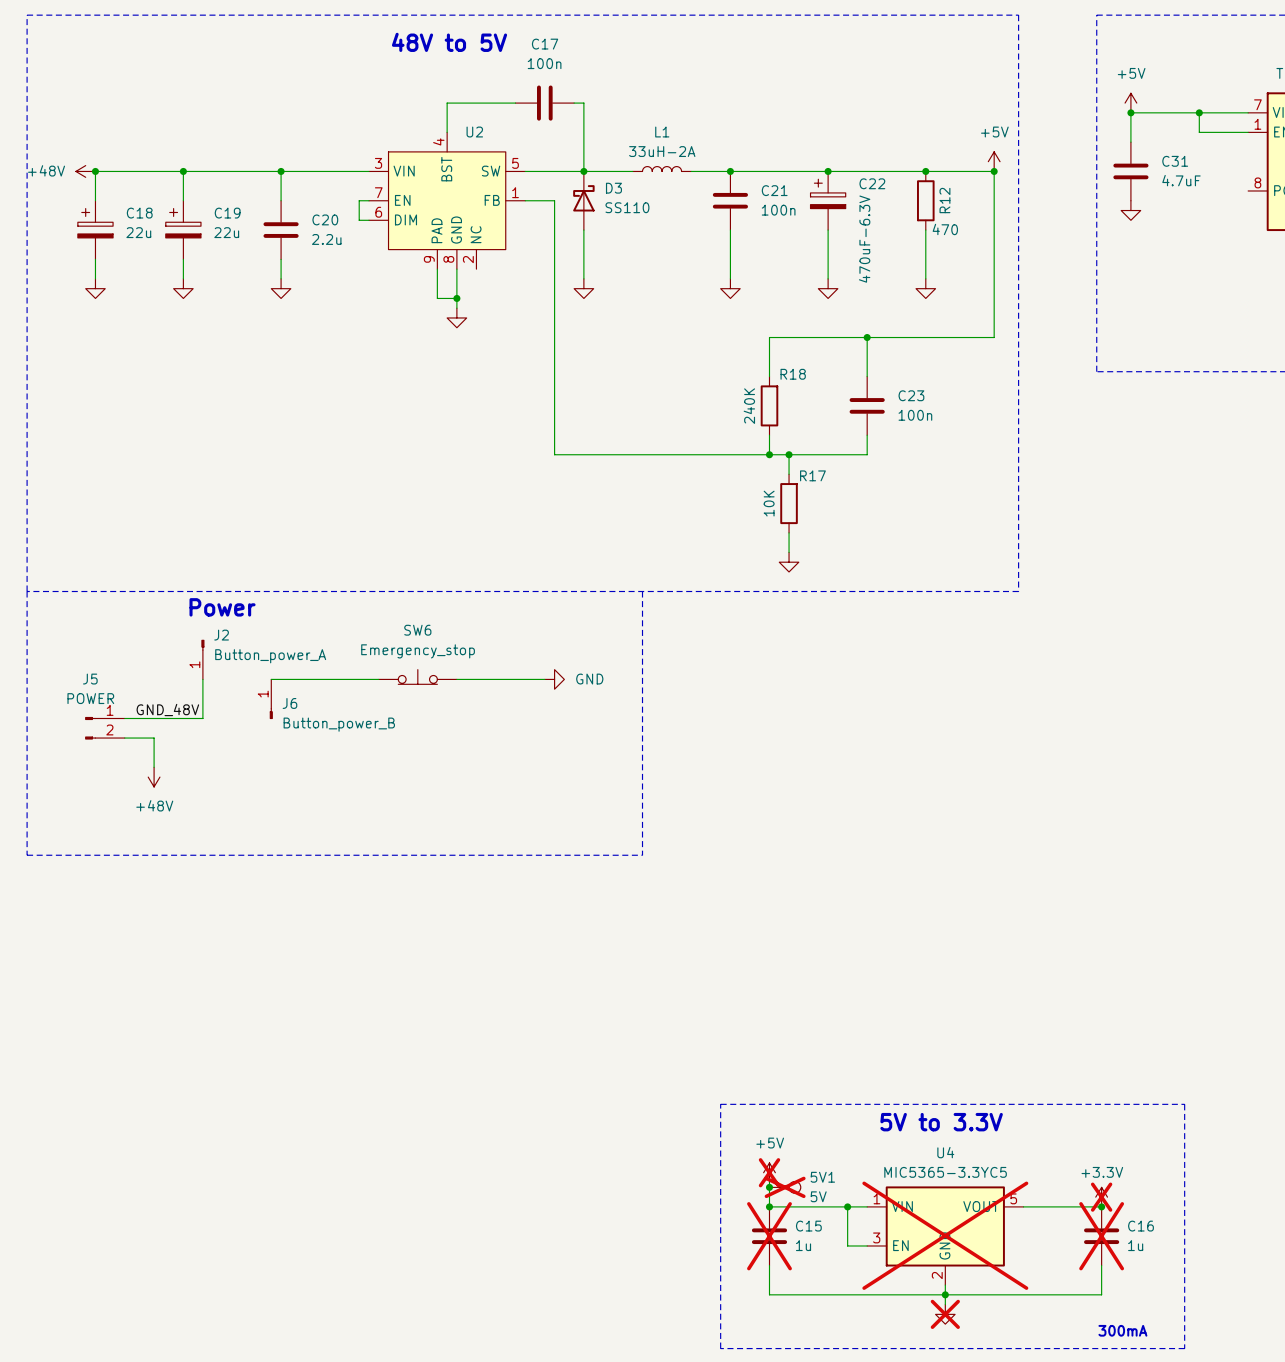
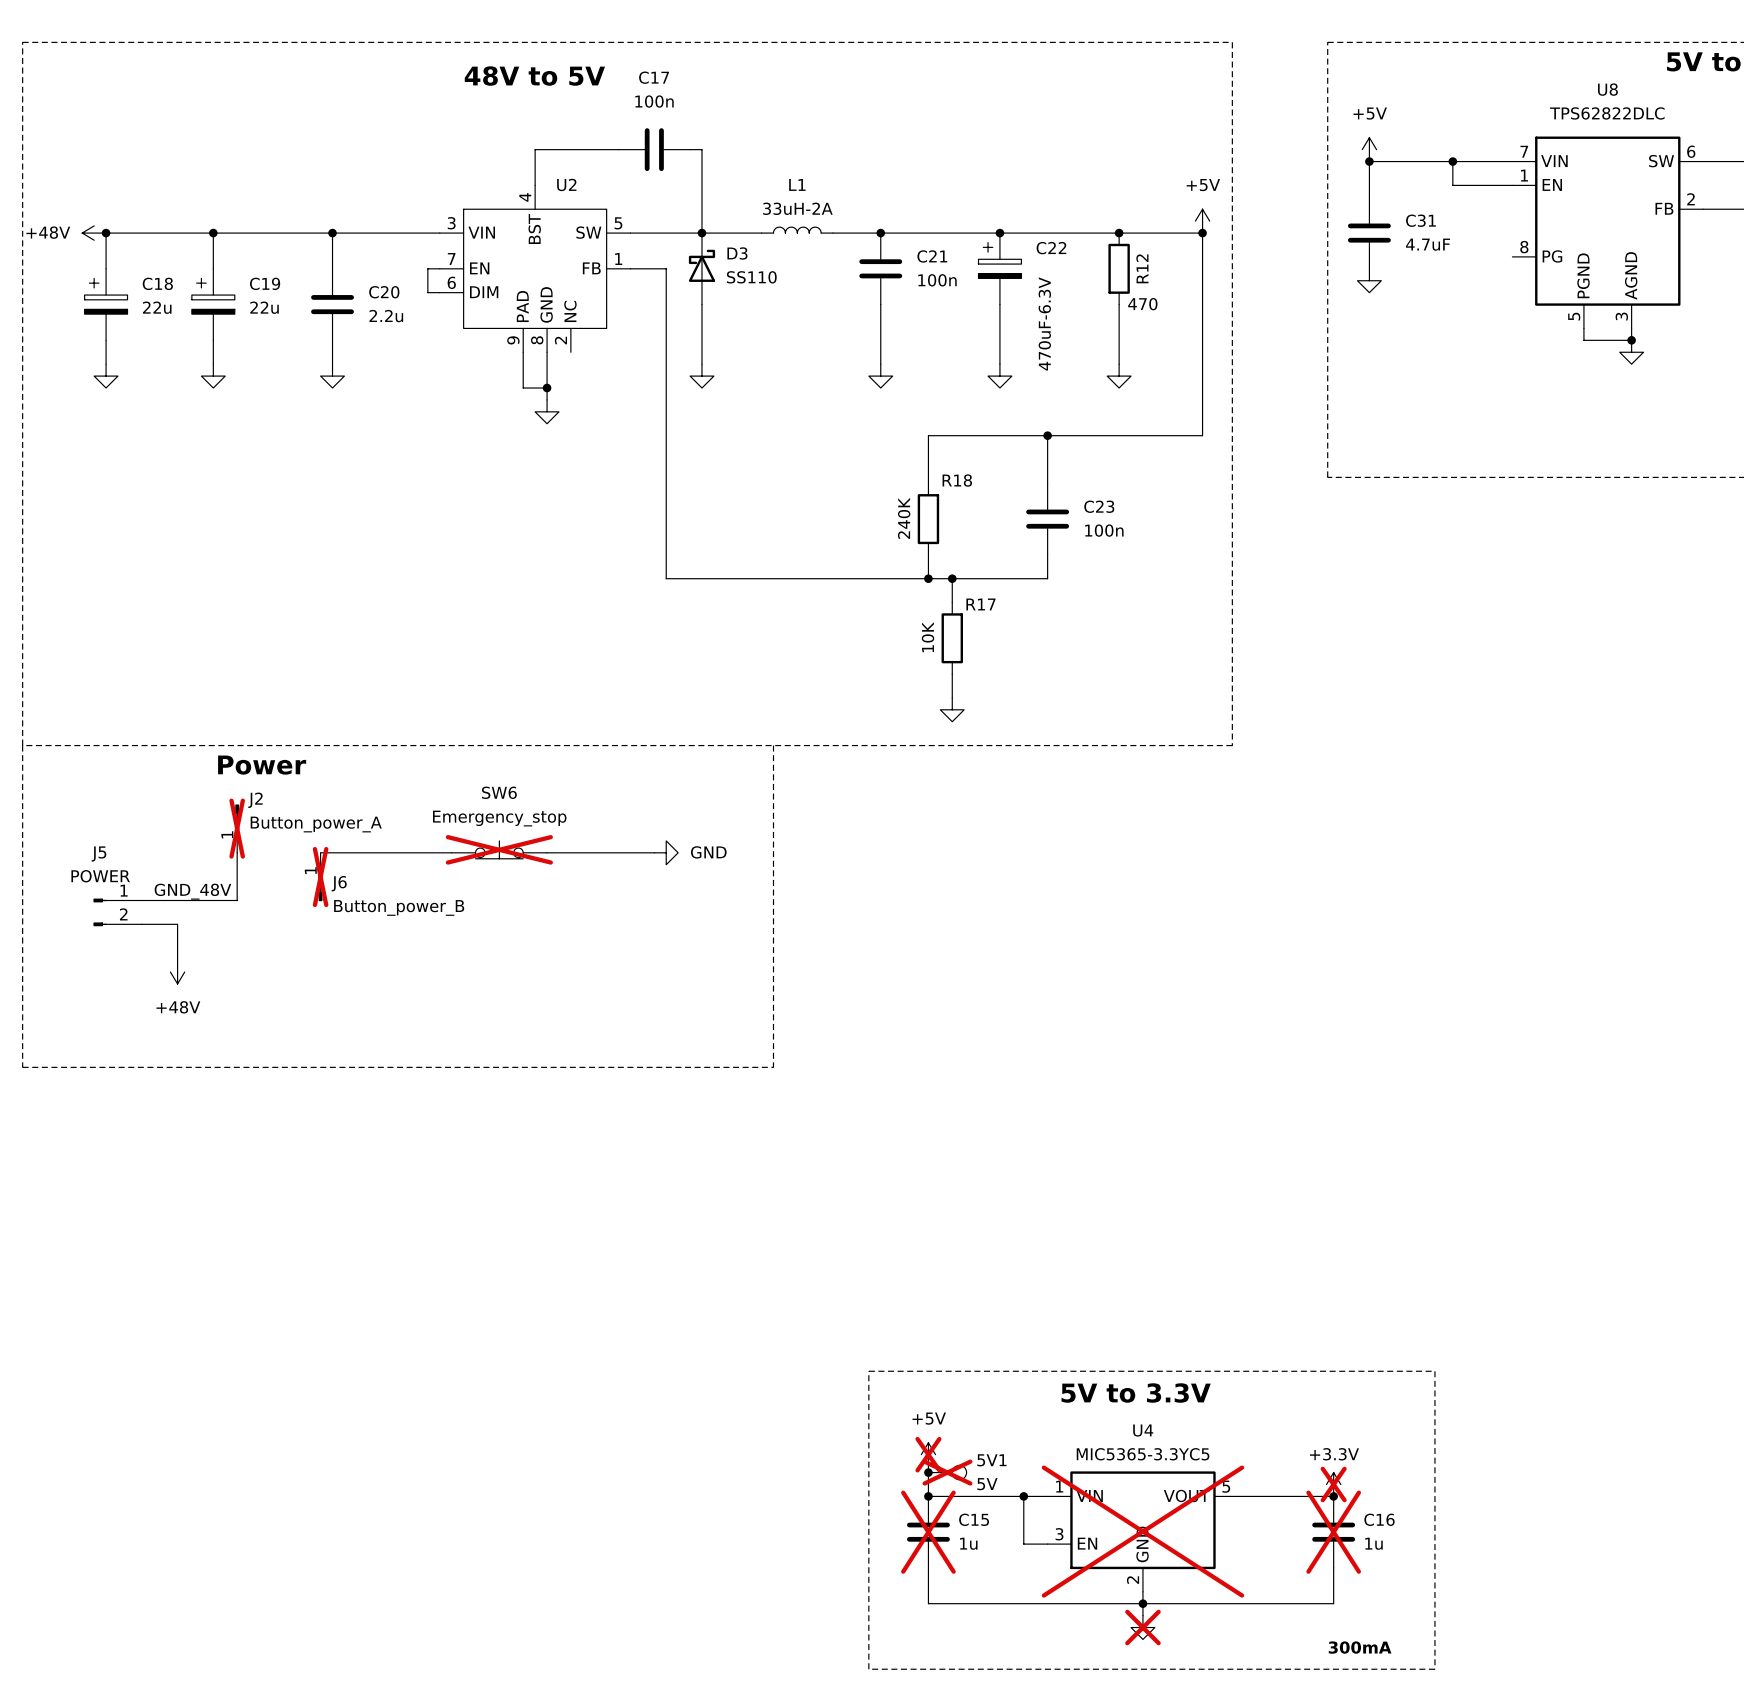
J2 do-not-place cross: none -> (237, 828)
SW6 do-not-place cross: none -> (499, 849)
J6 do-not-place cross: none -> (320, 877)

